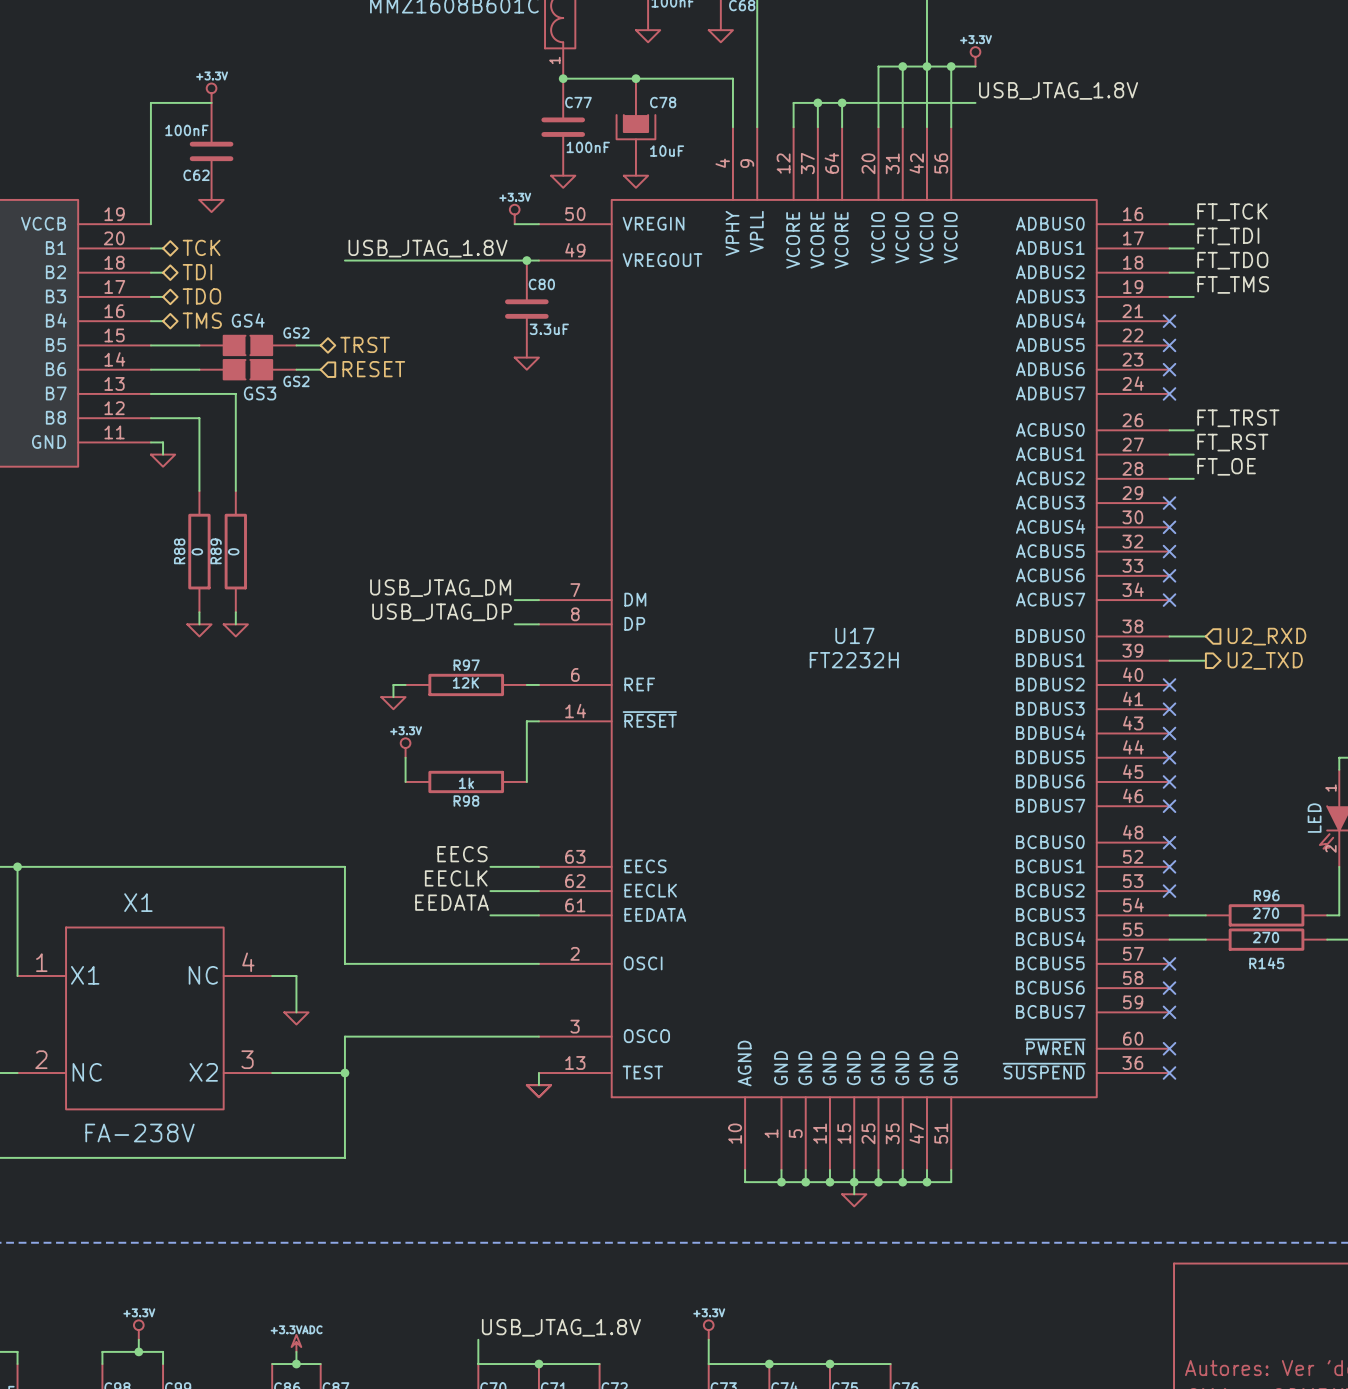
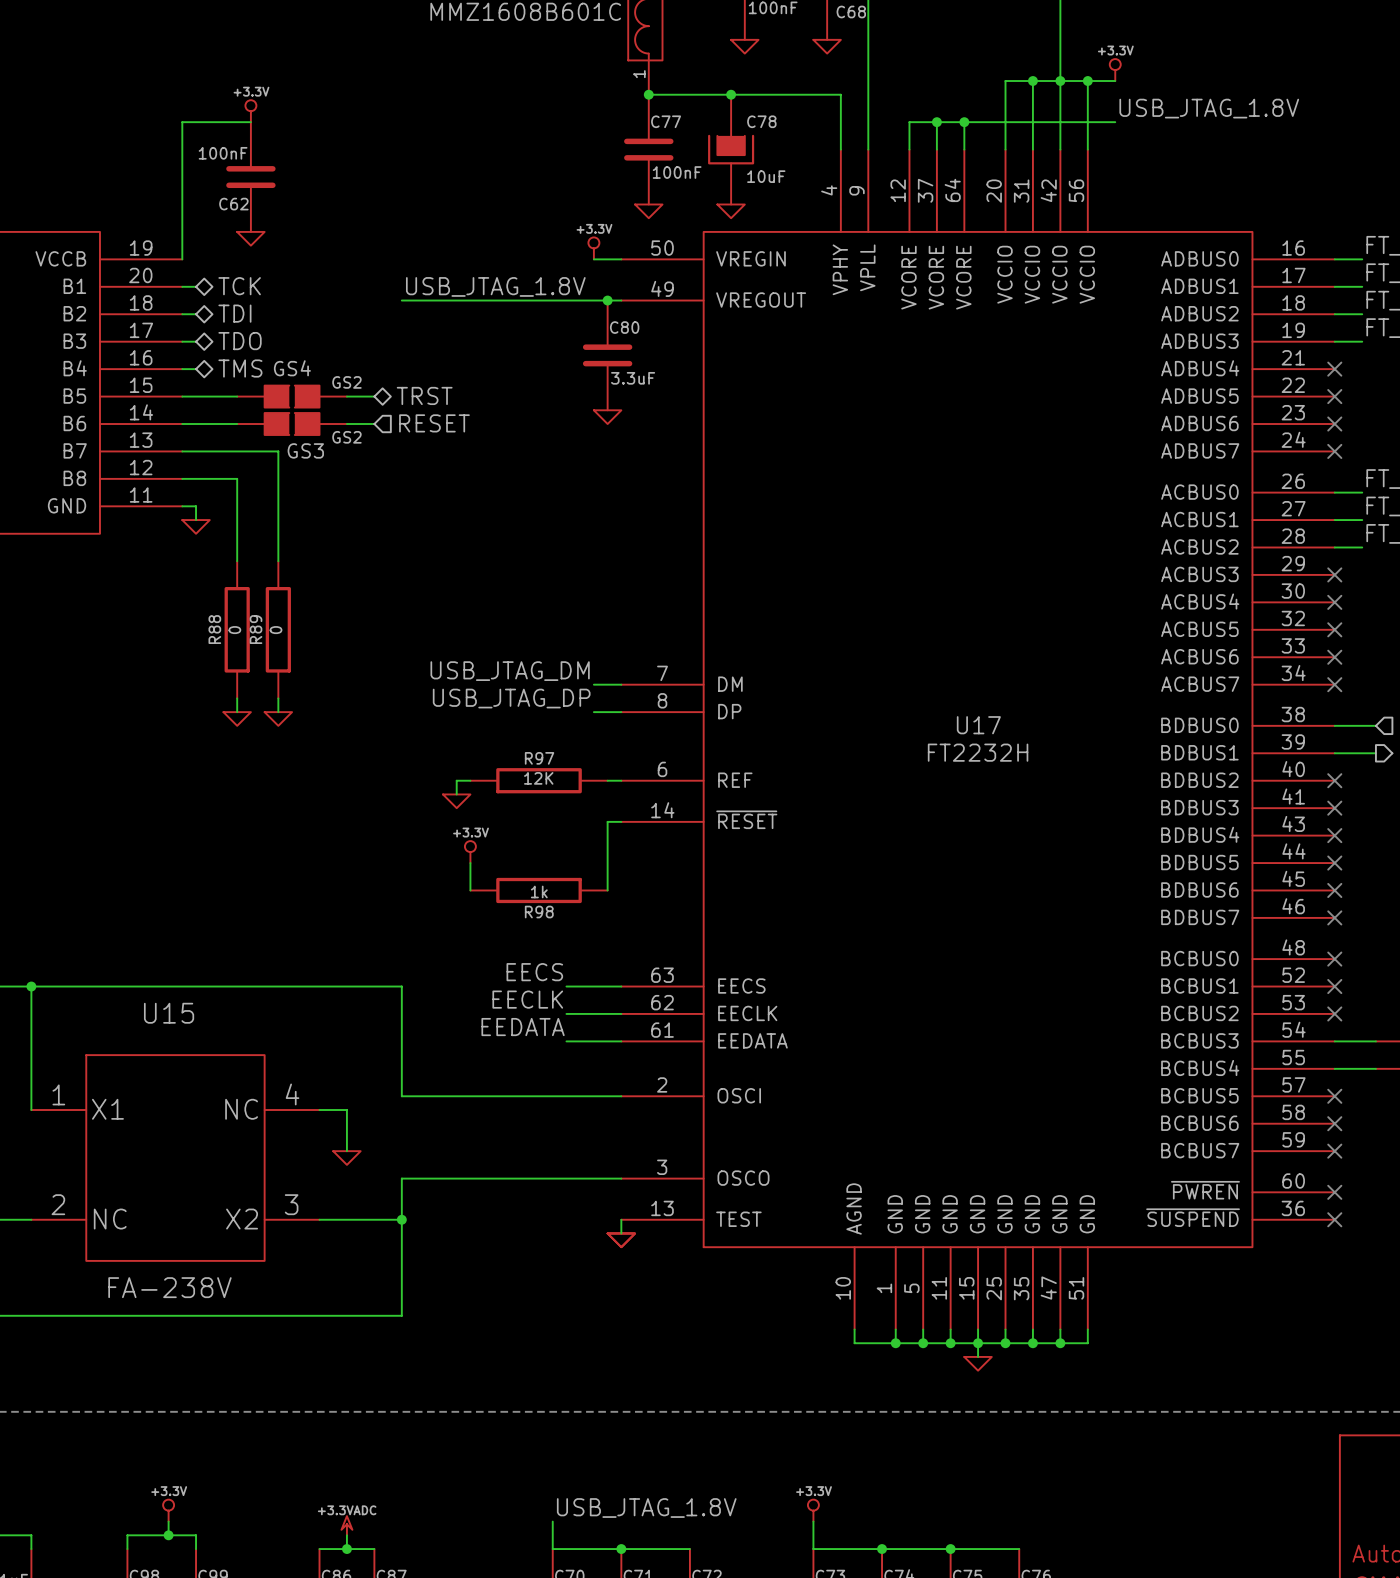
X1 name: X1 (138, 902) -> U15 (169, 1013)

